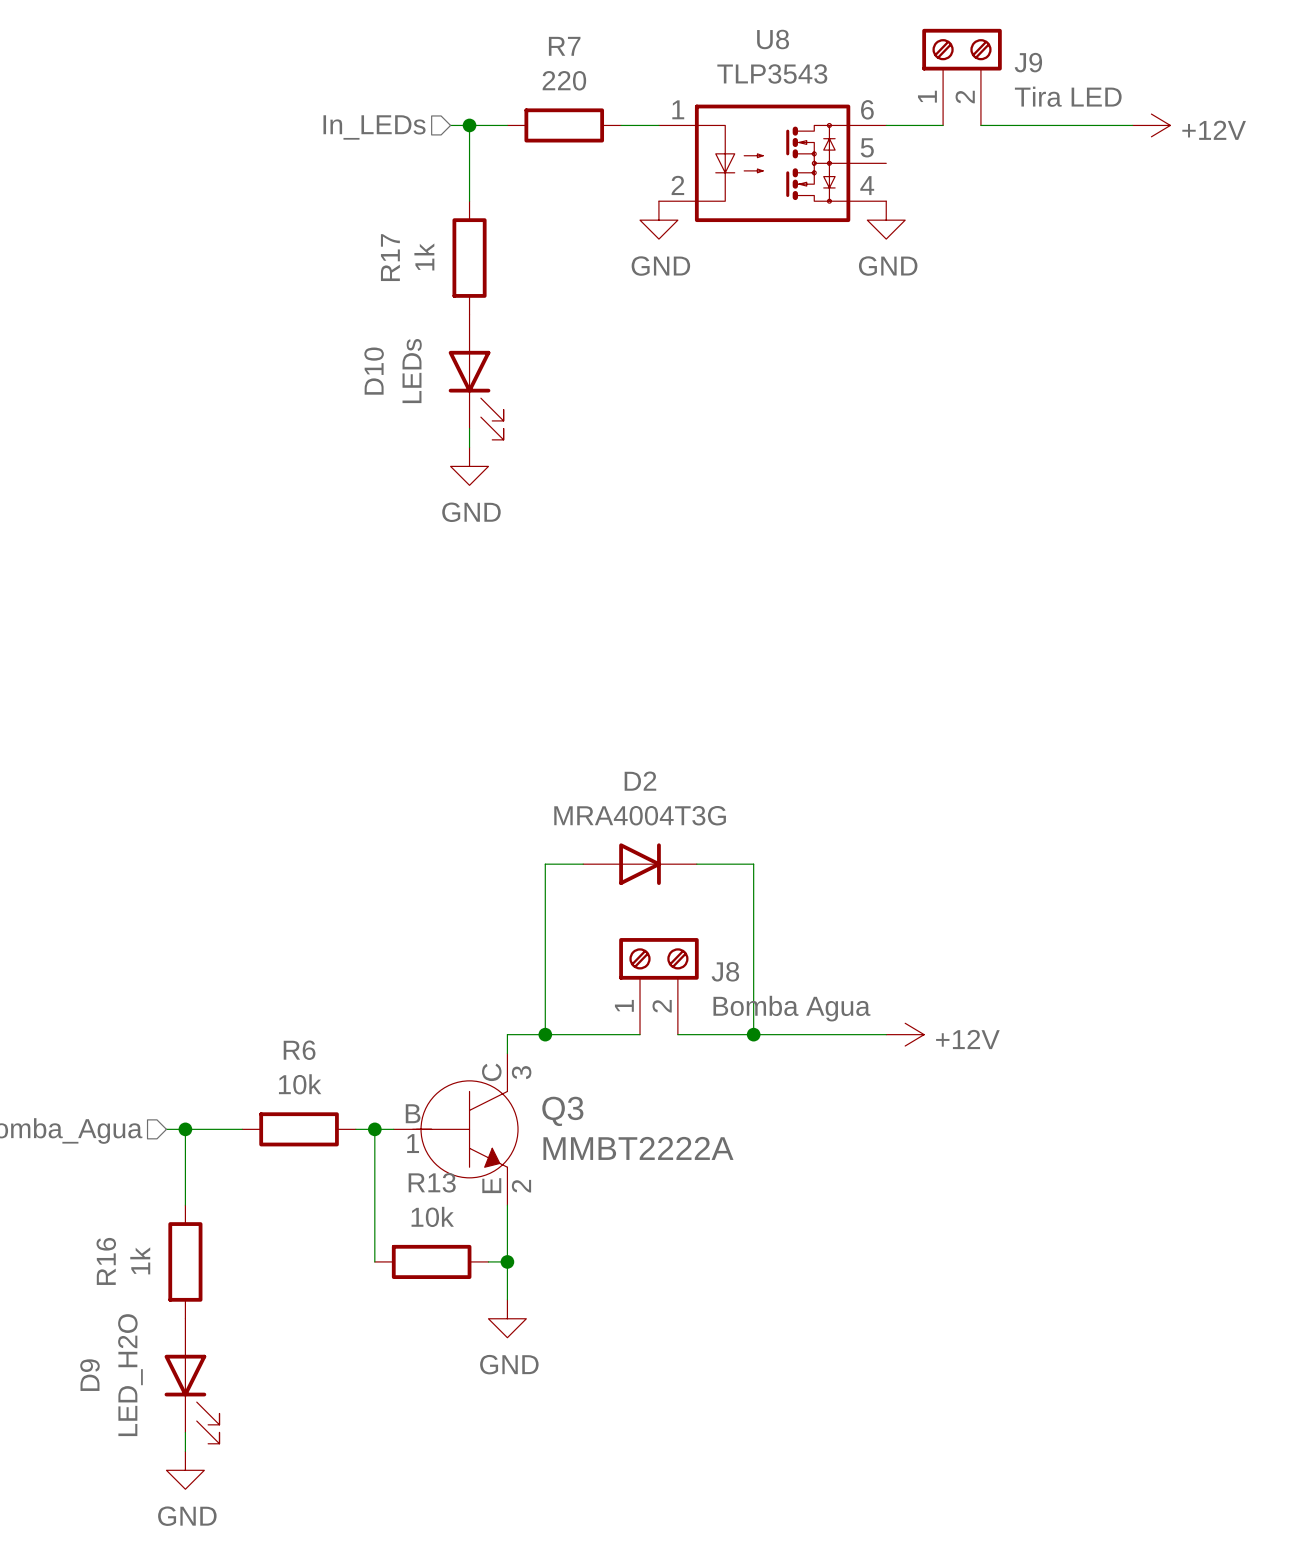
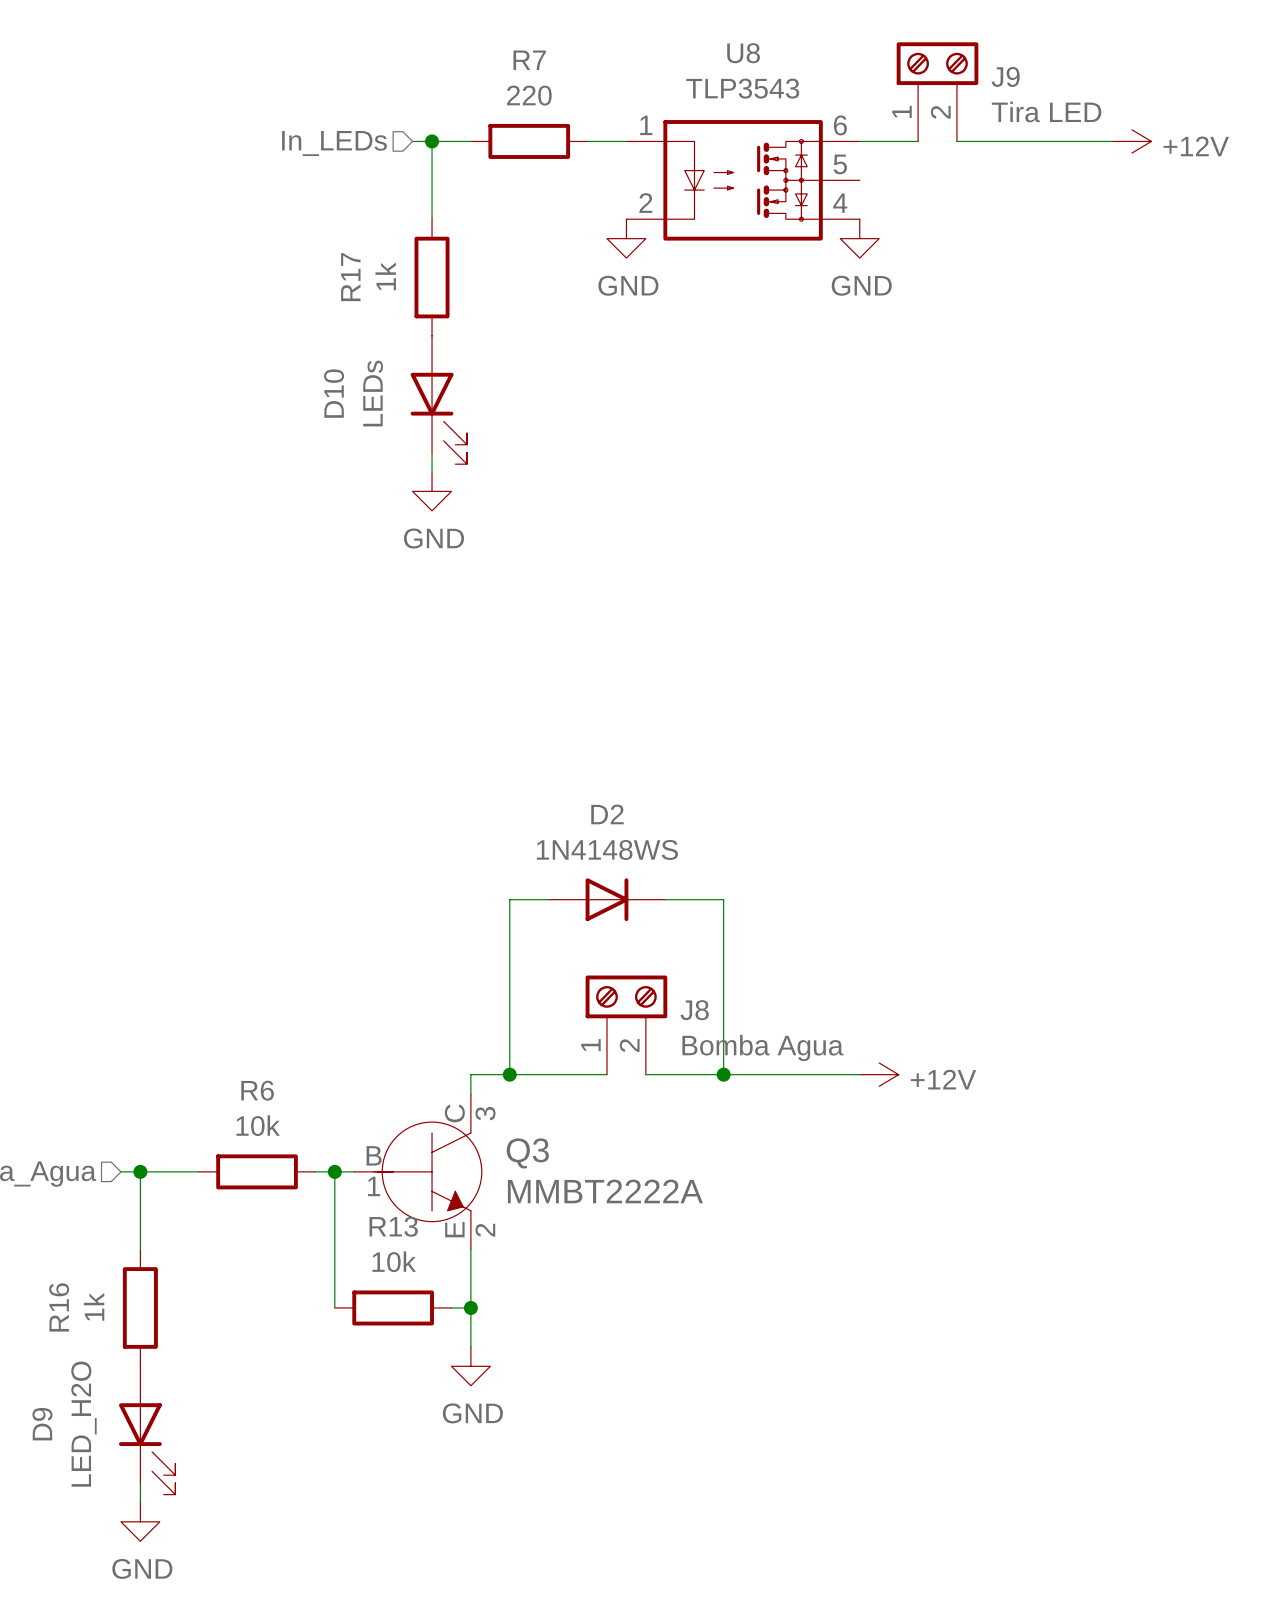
D2 value: MRA4004T3G (640, 815) -> 1N4148WS (607, 849)

